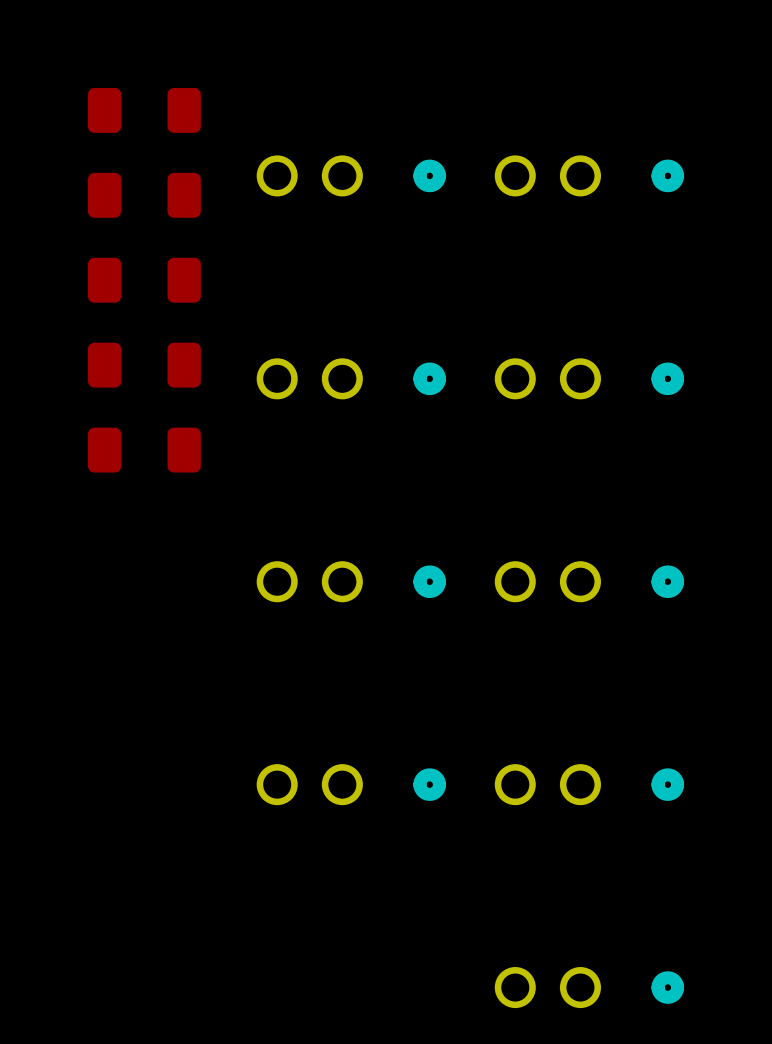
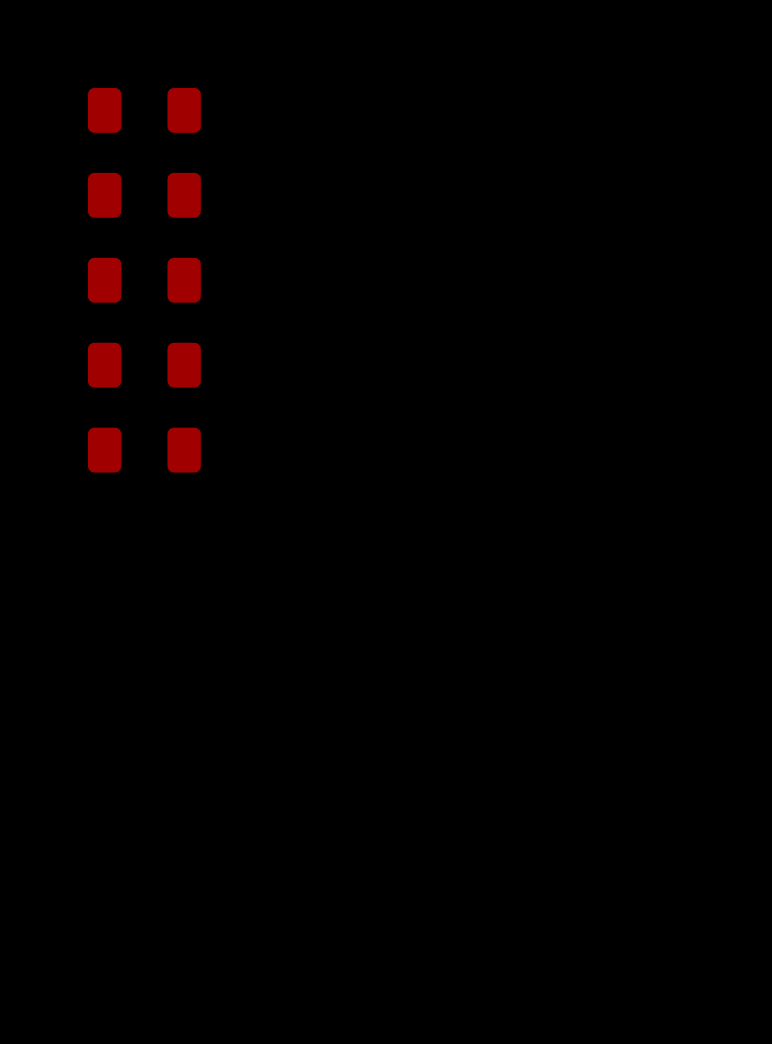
part: (351, 175) -> none
part: (589, 175) -> none
part: (351, 378) -> none
part: (589, 378) -> none
part: (351, 581) -> none
part: (589, 581) -> none
part: (351, 784) -> none
part: (589, 784) -> none
part: (589, 987) -> none

